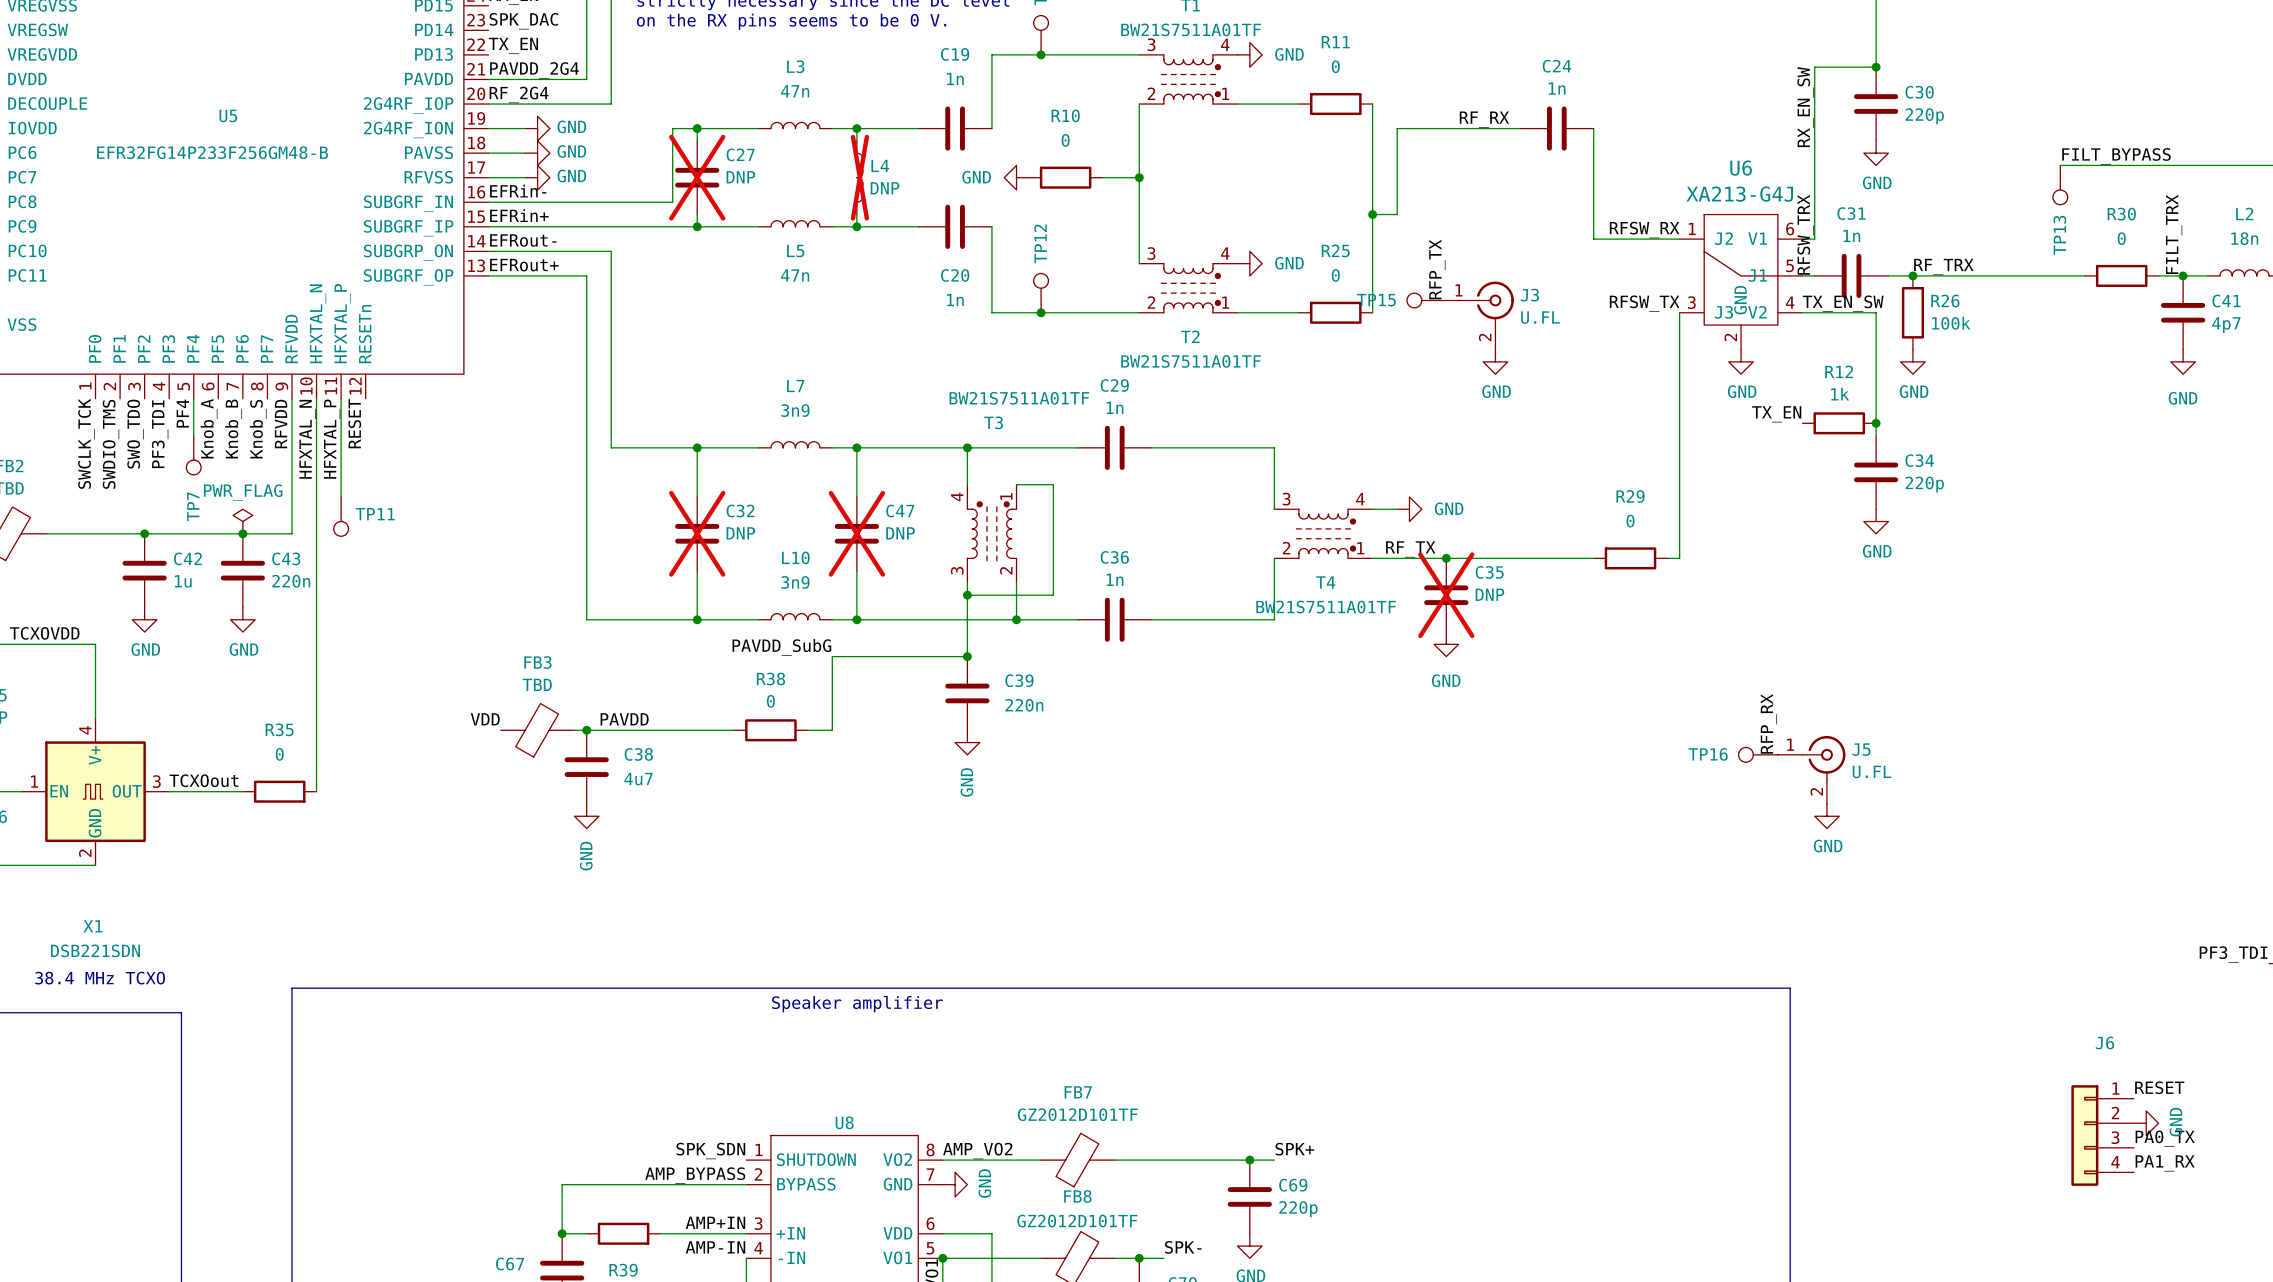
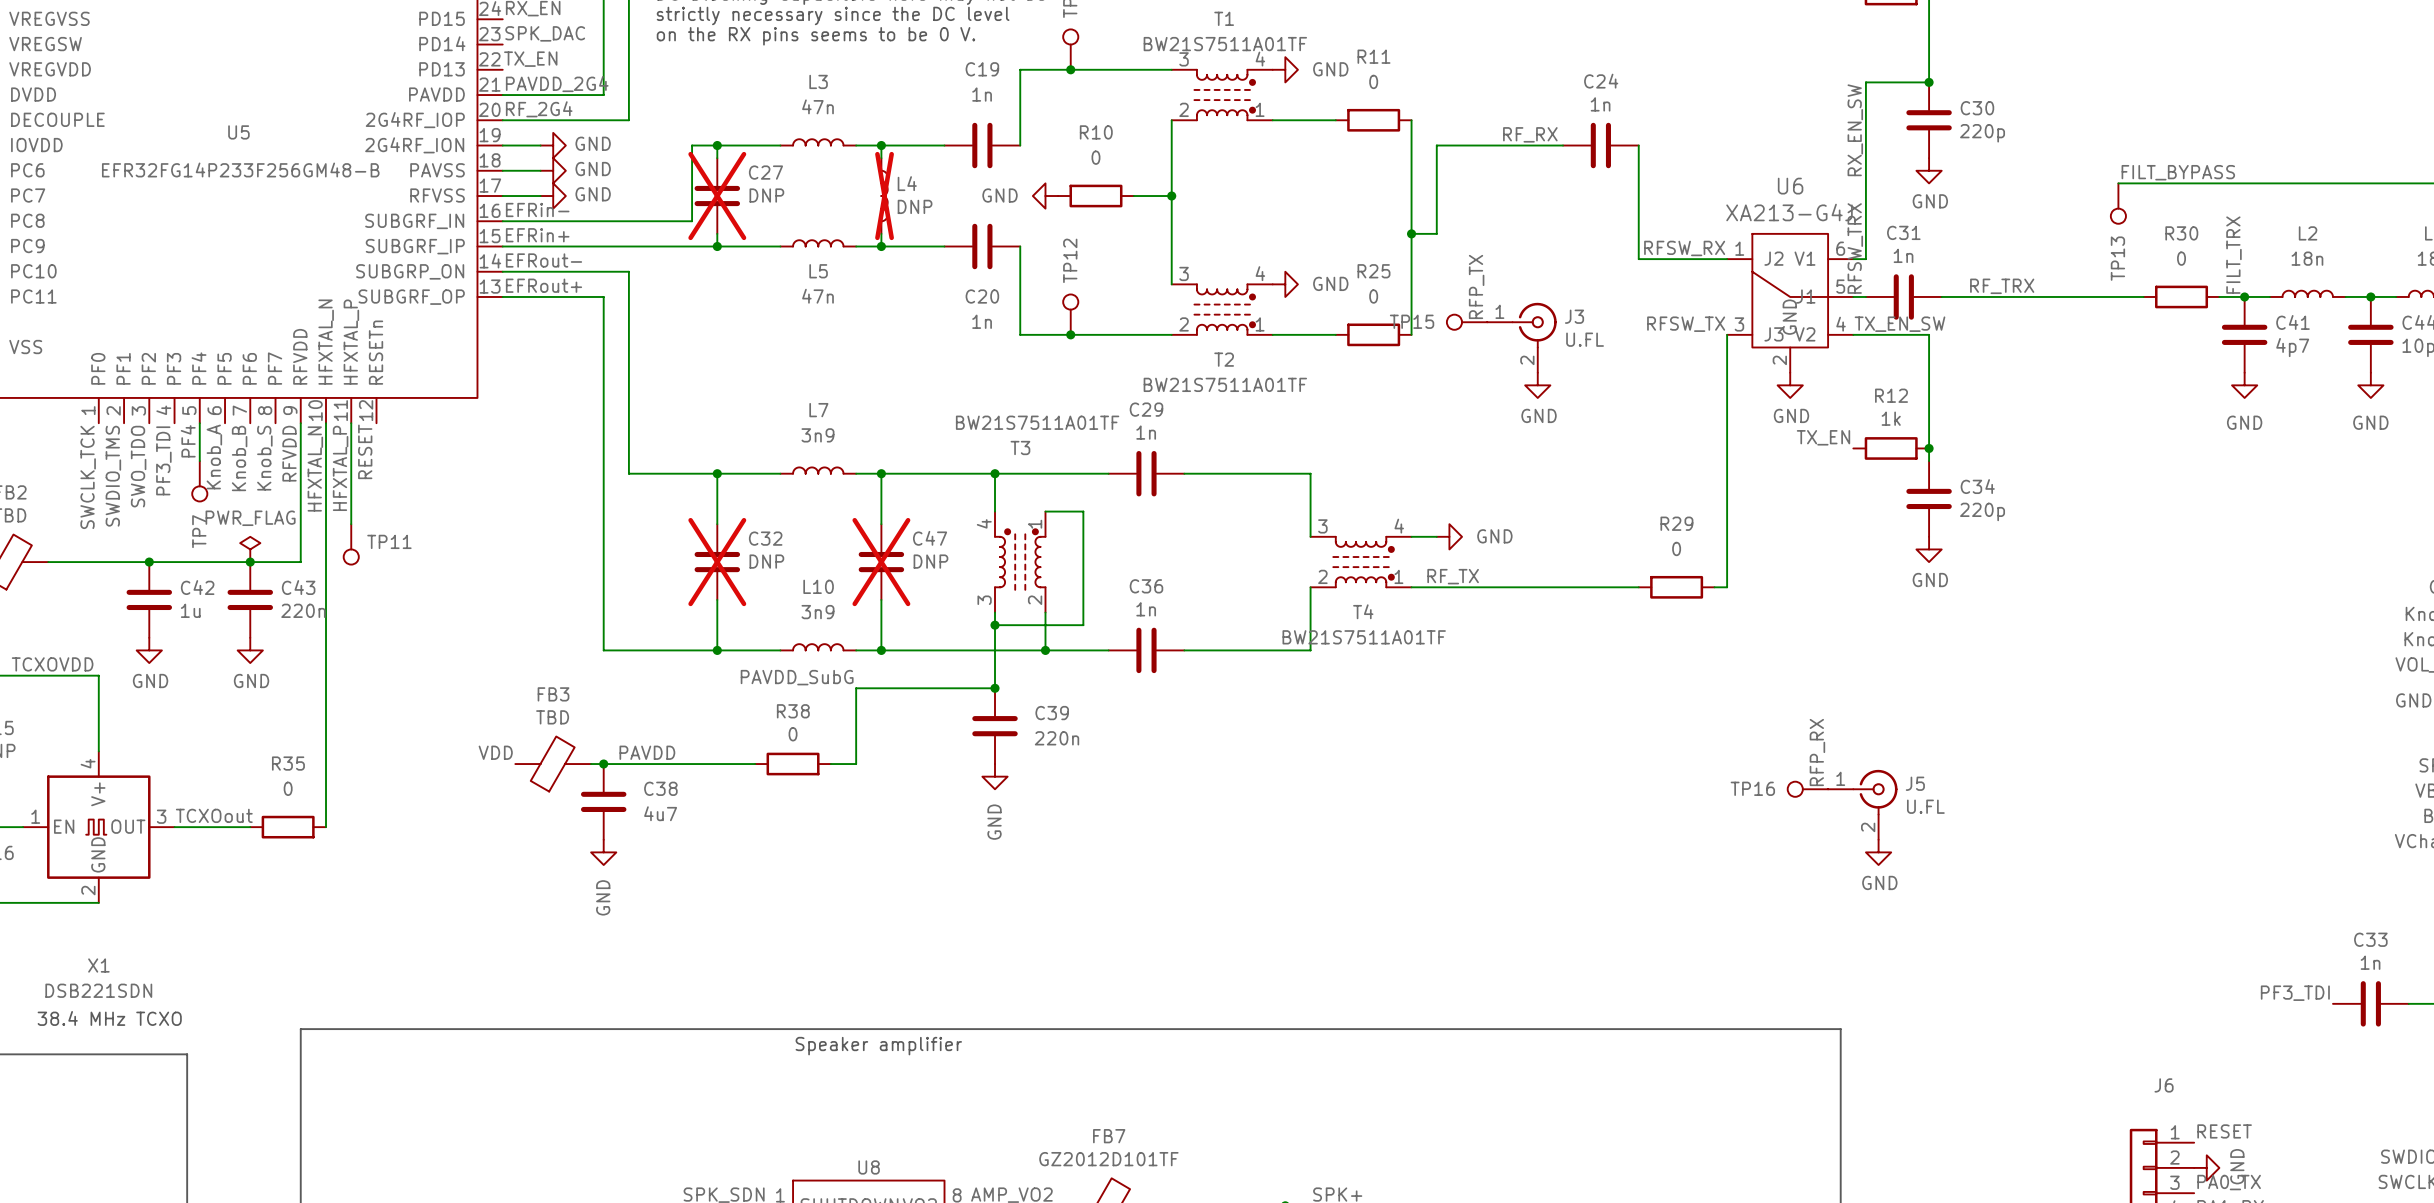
junction: (1912, 275) -> none
R26: 100k (1912, 312) -> none
power symbol: GND (1912, 361) -> none
junction: (1446, 558) -> none
C35: DNP (1446, 595) -> none
power symbol: GND (1446, 644) -> none

